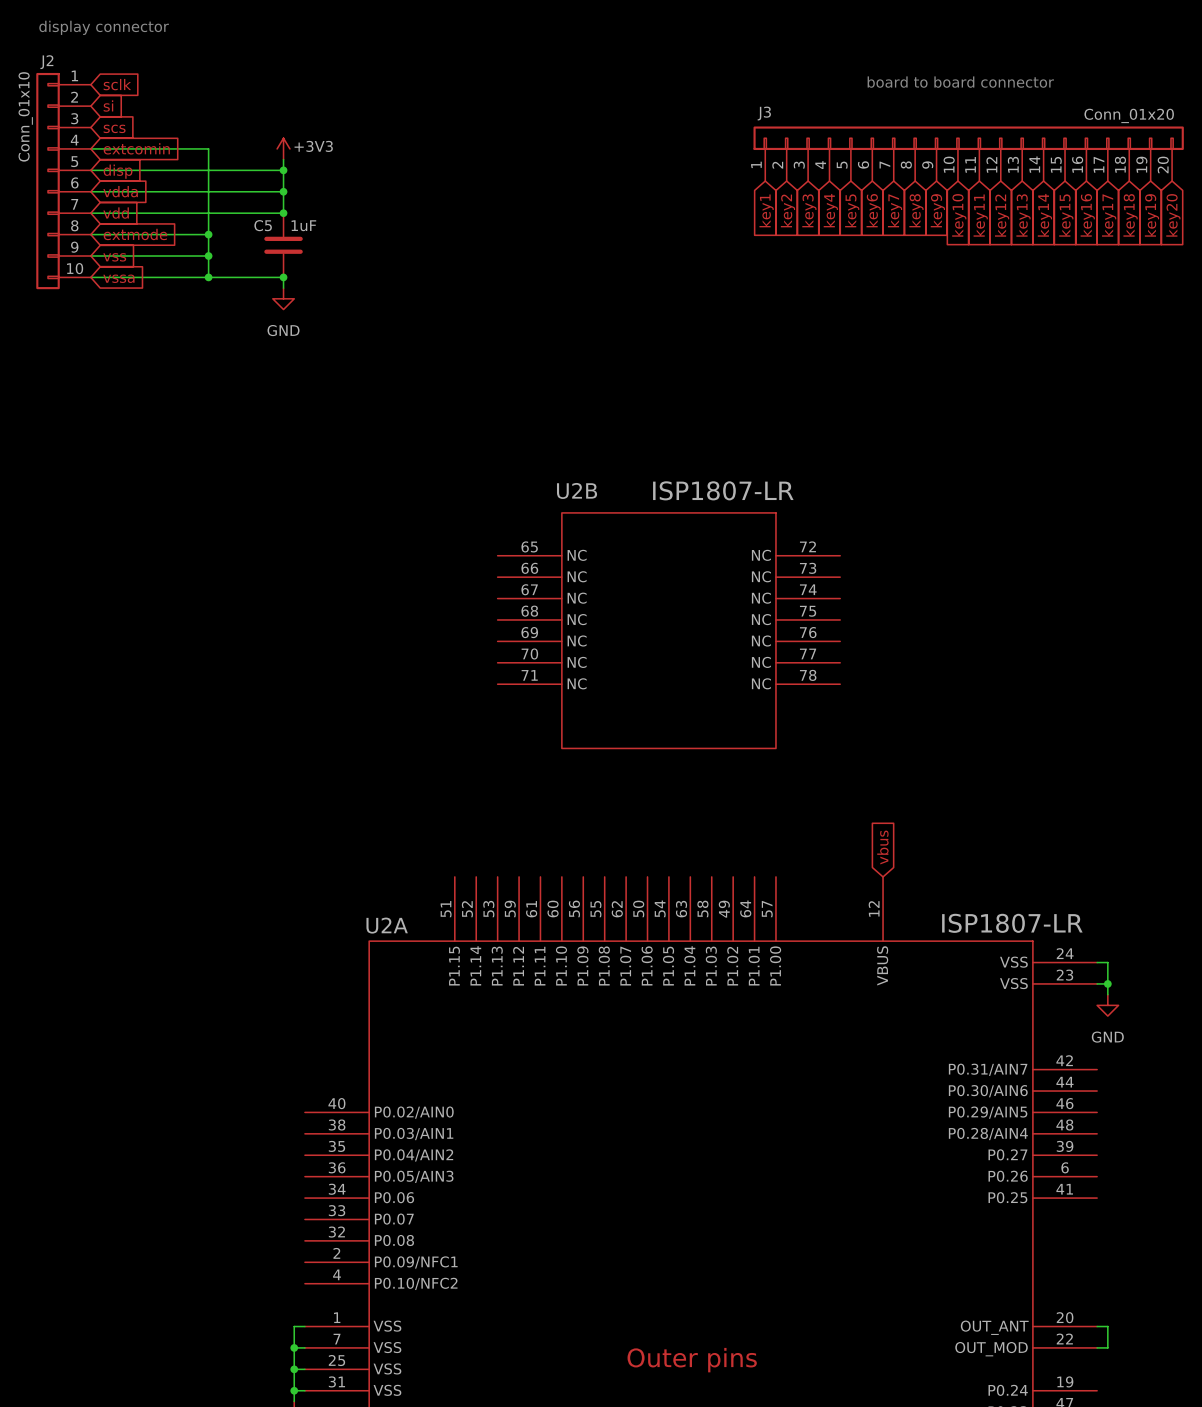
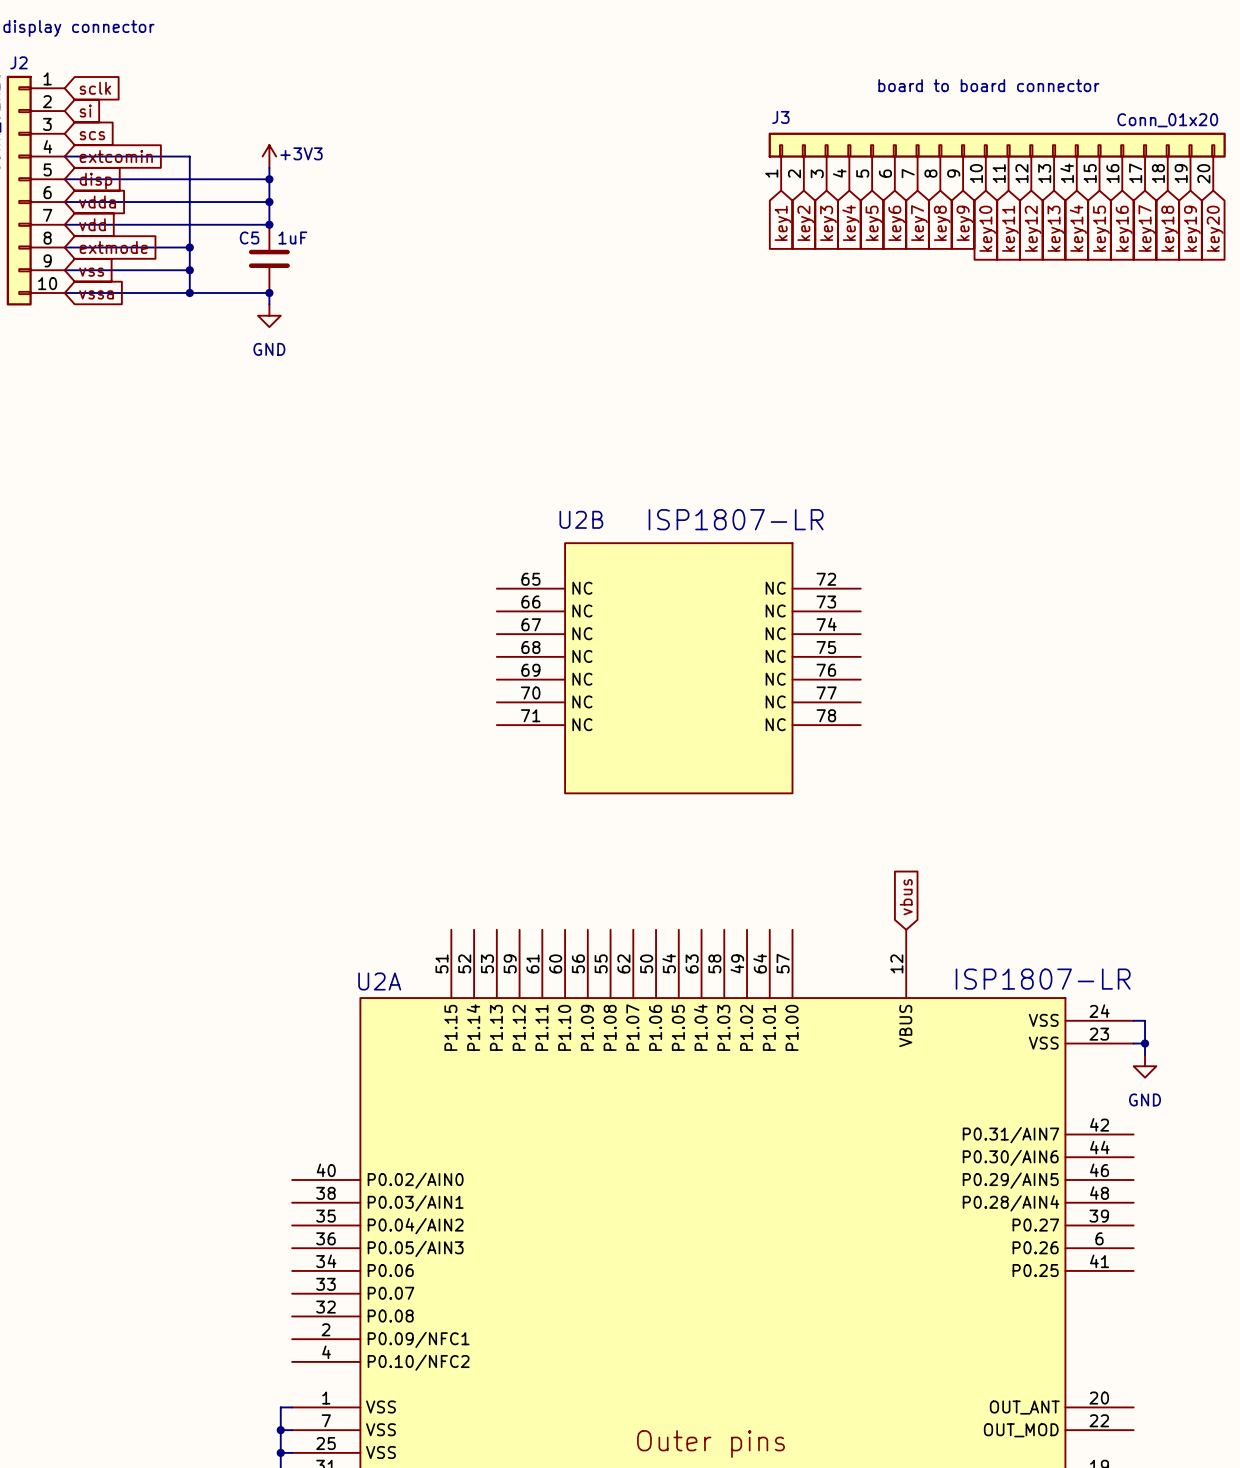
wire: (1097, 1326) (1107, 1326) (1107, 1347) (1097, 1347) -> none

